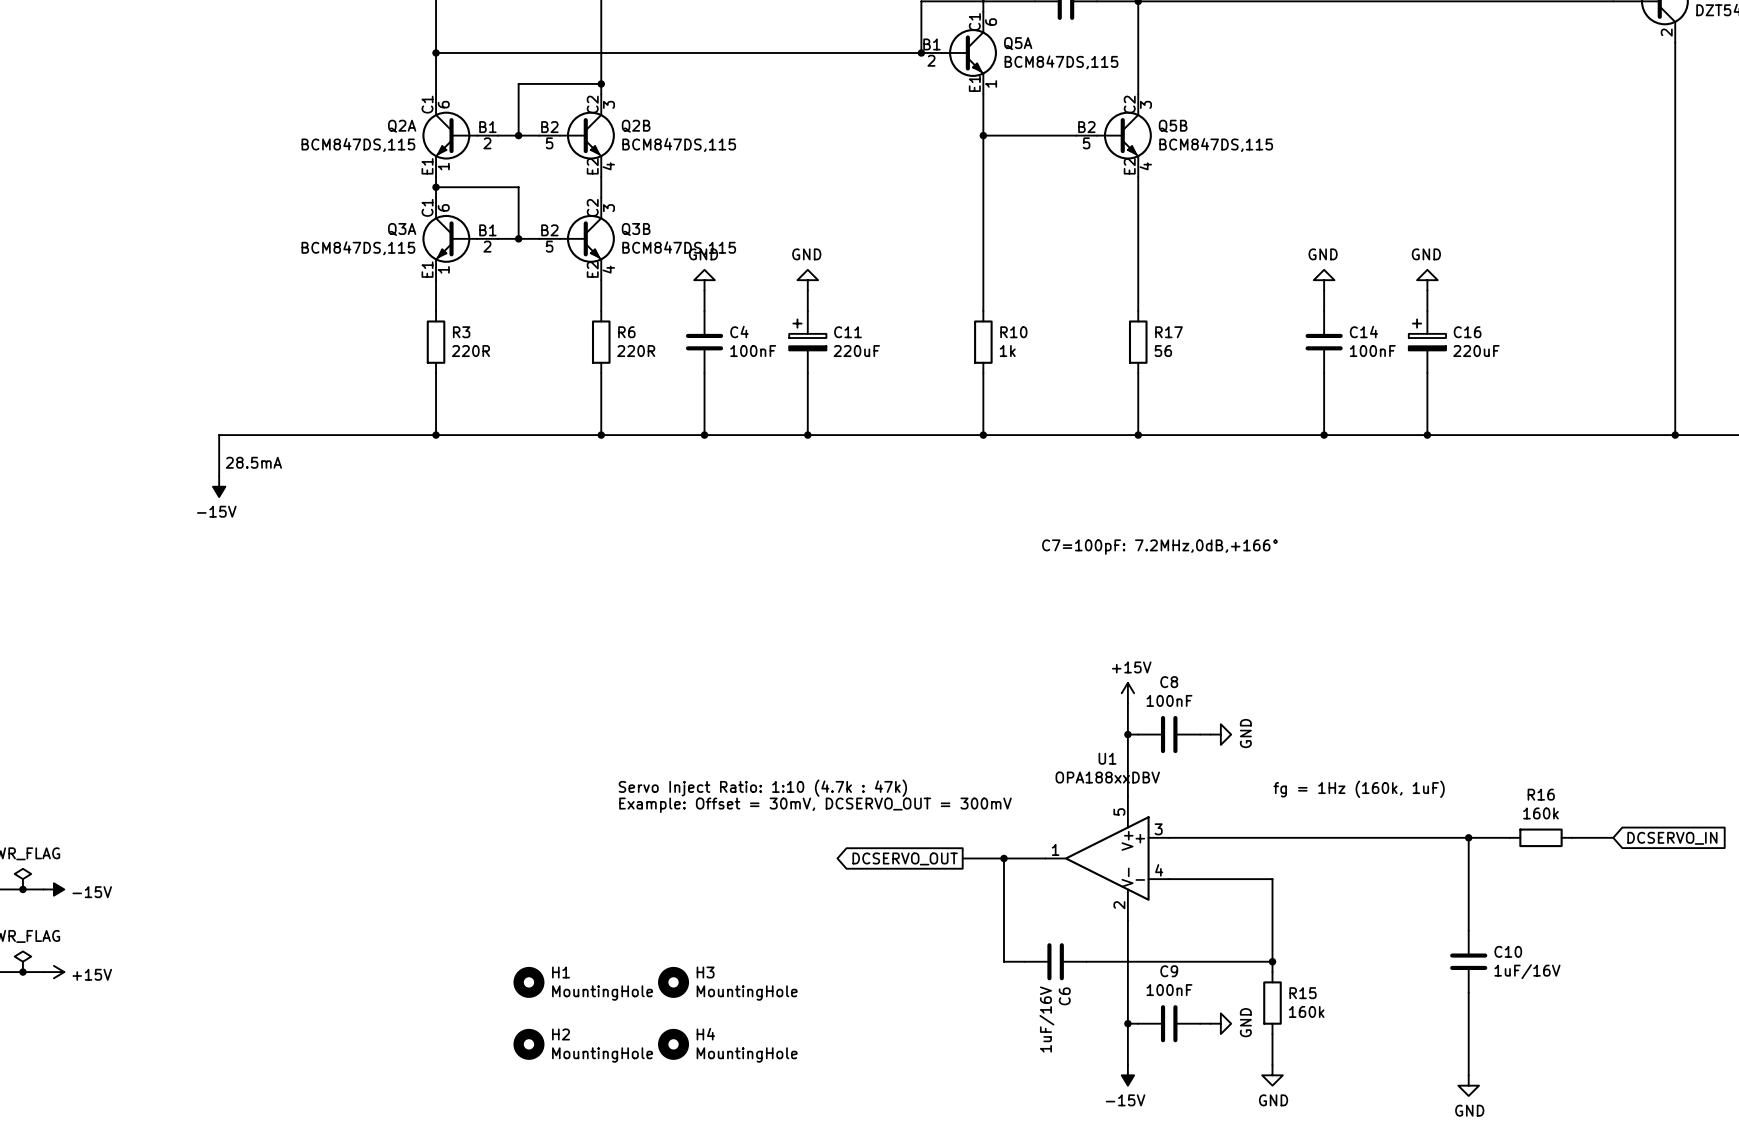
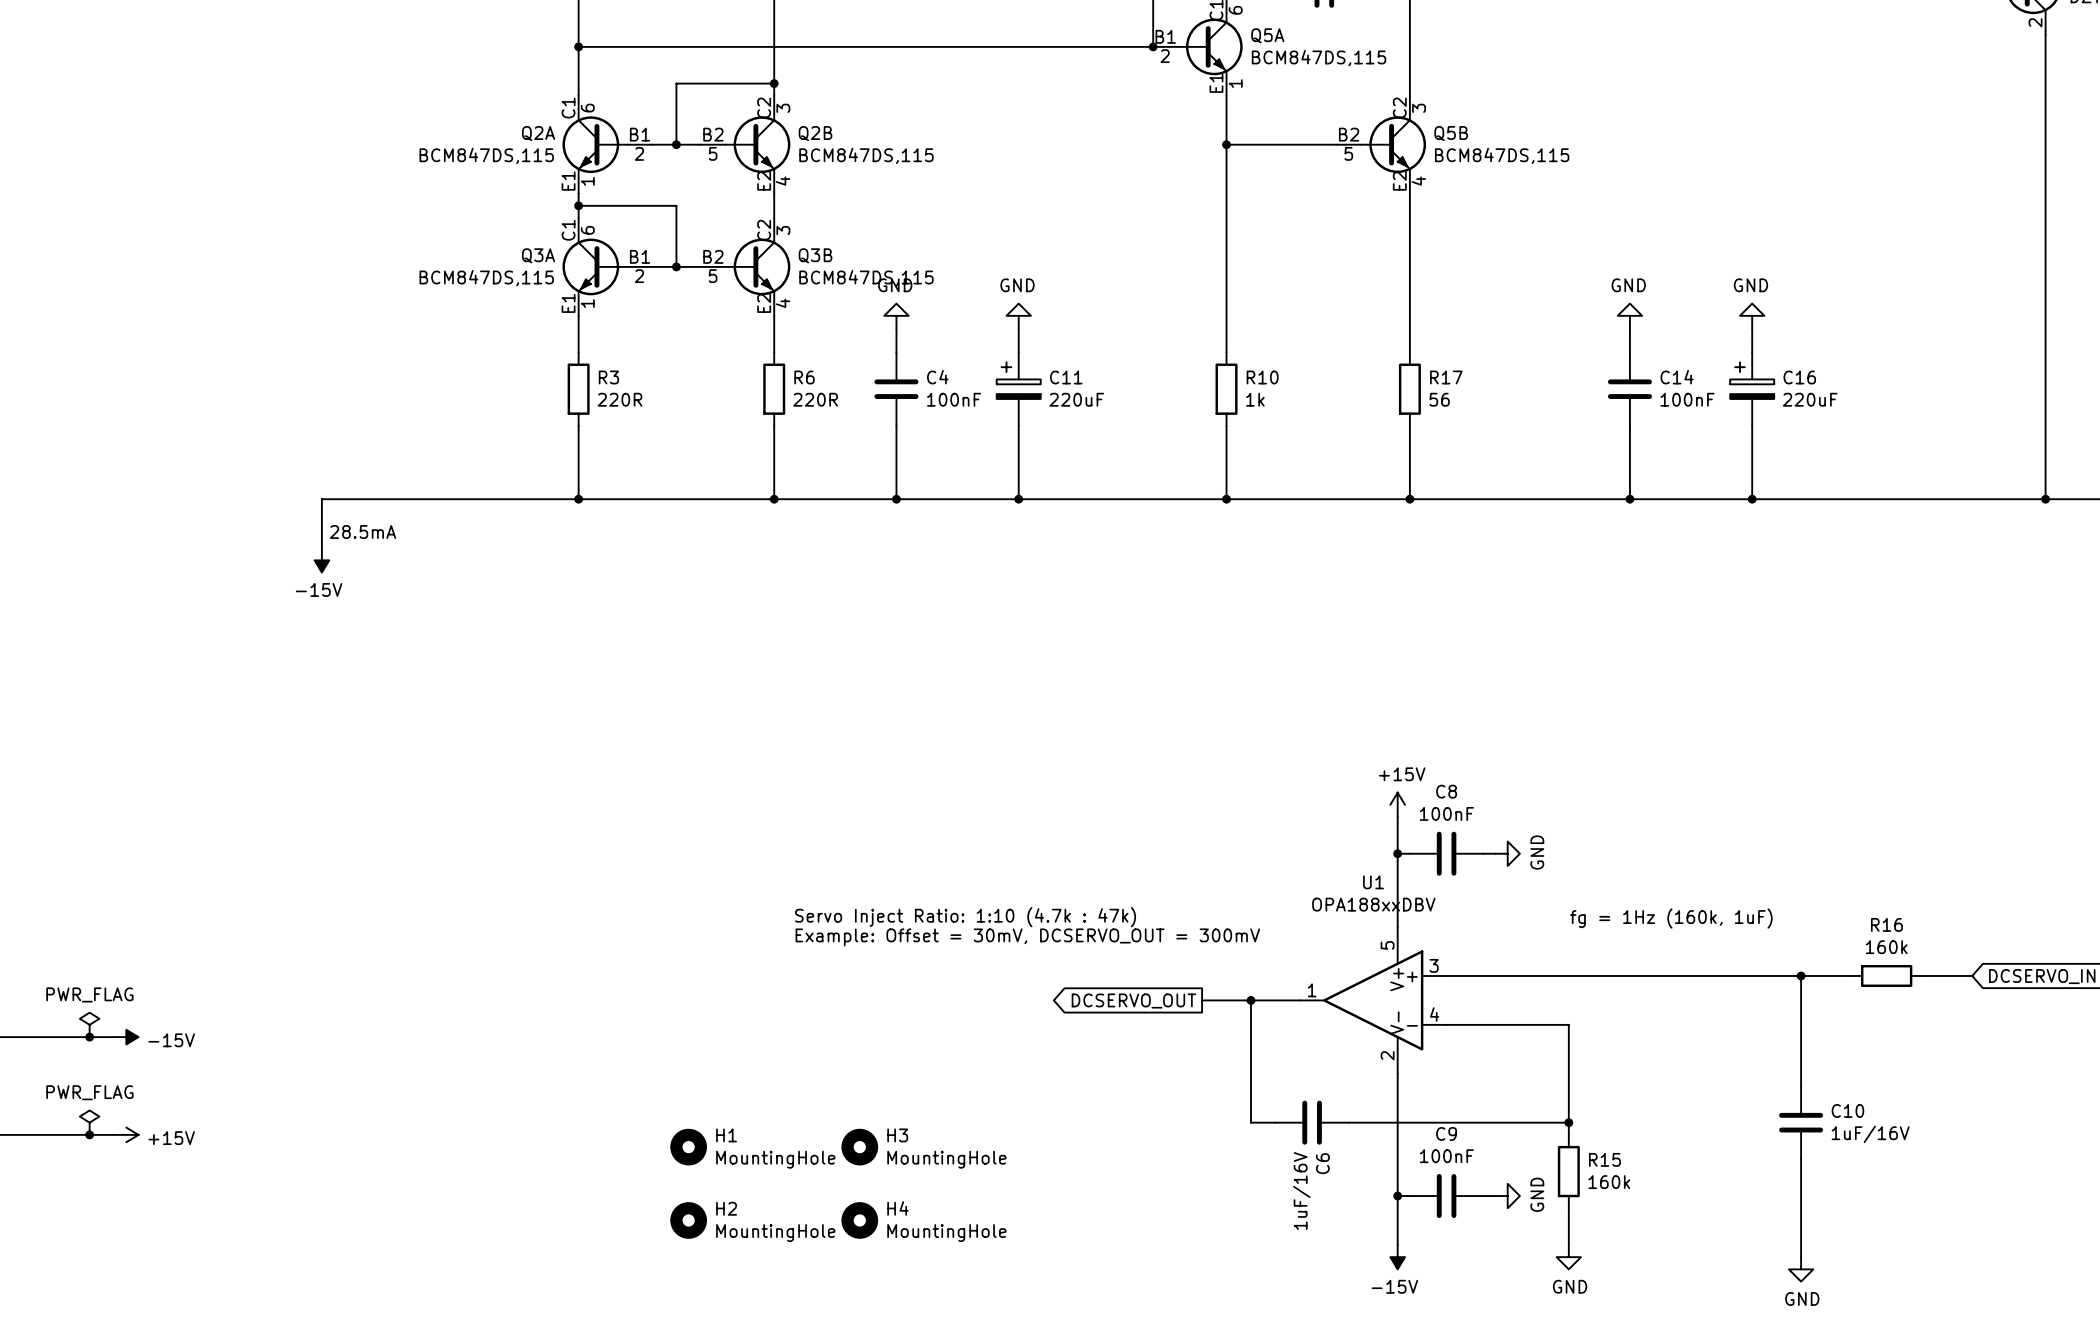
text: C7=100pF: 7.2MHz,0dB,+166° (1159, 547) -> none

